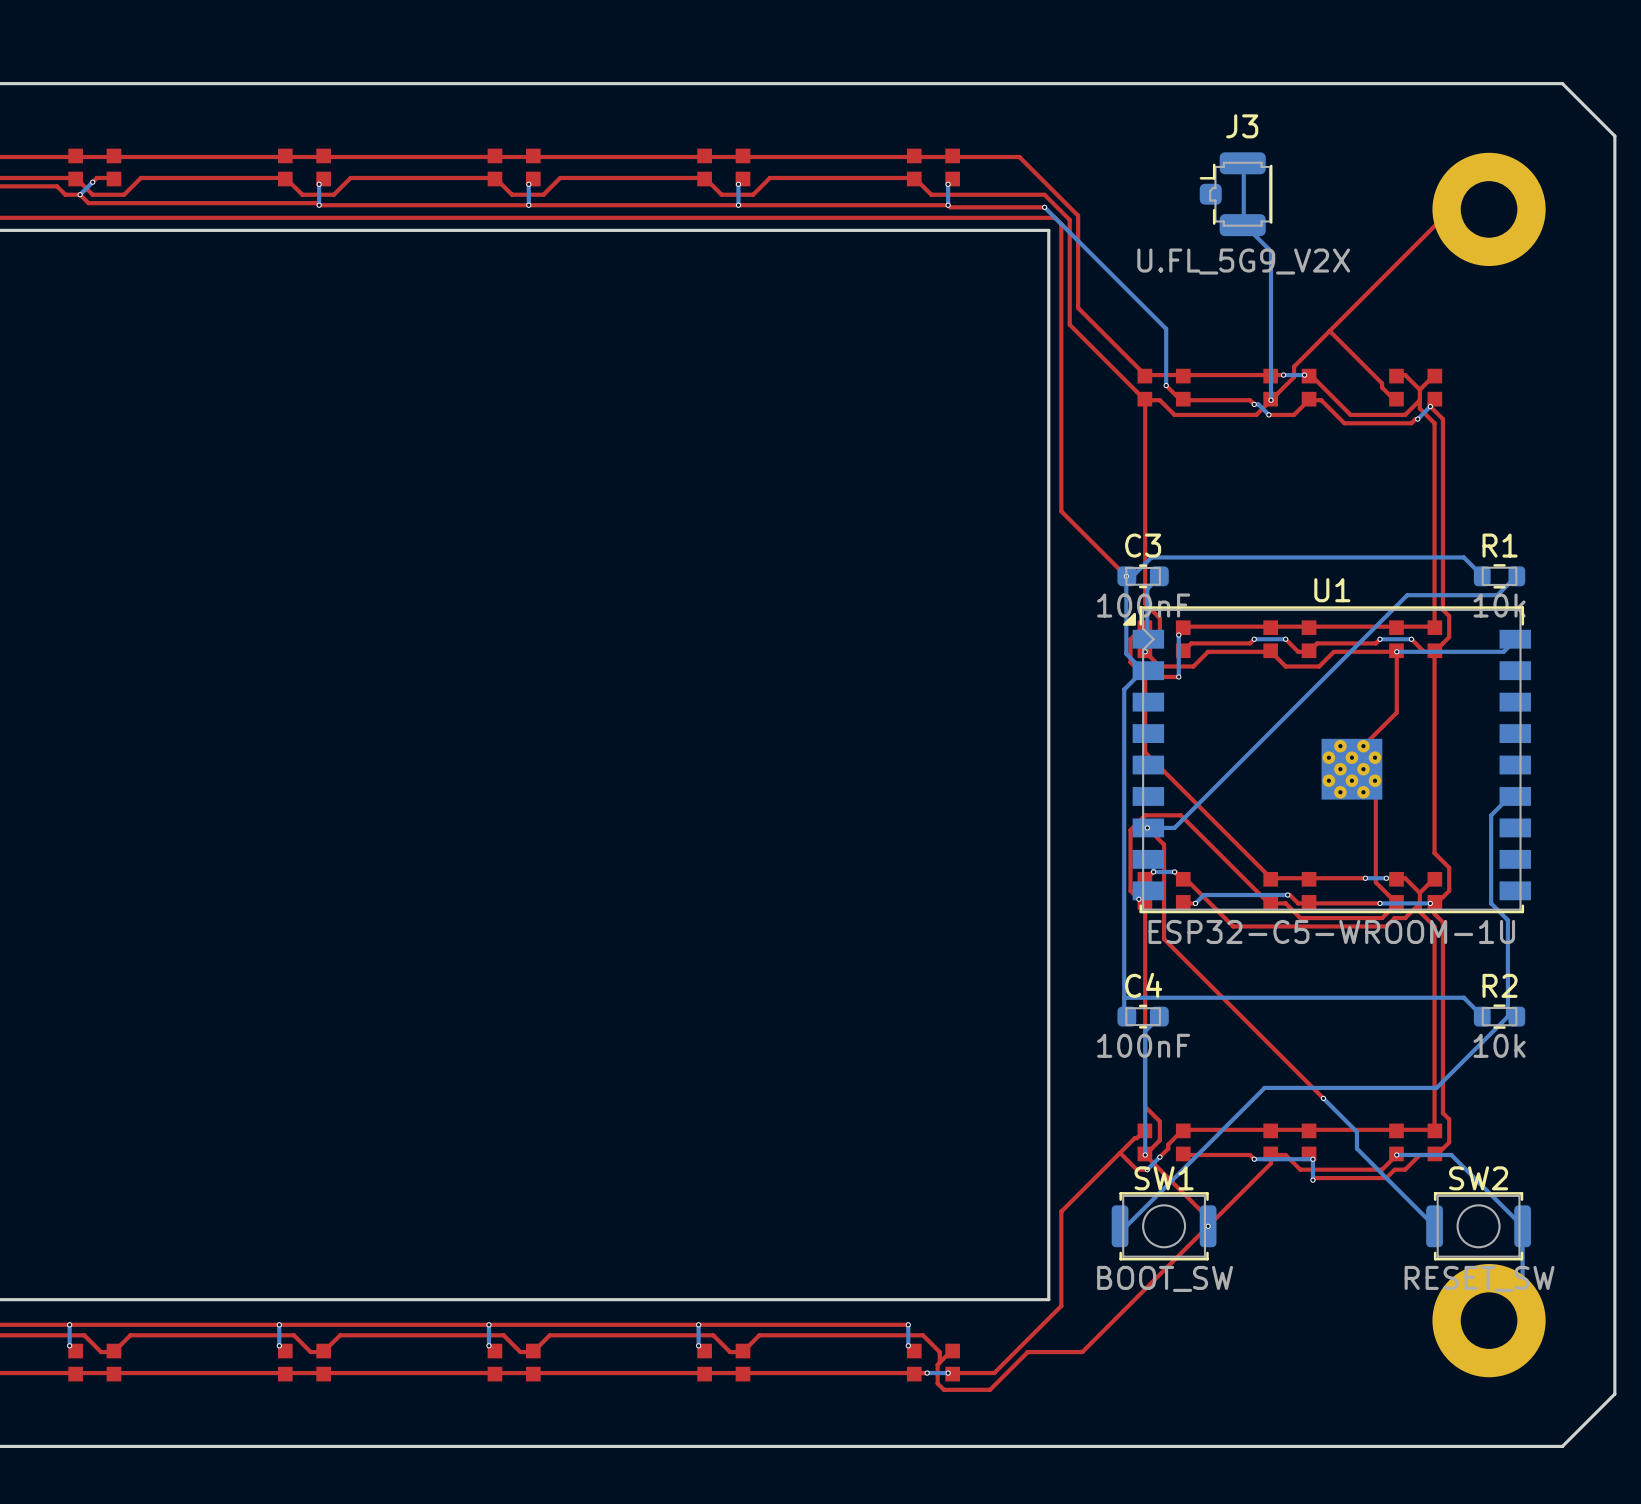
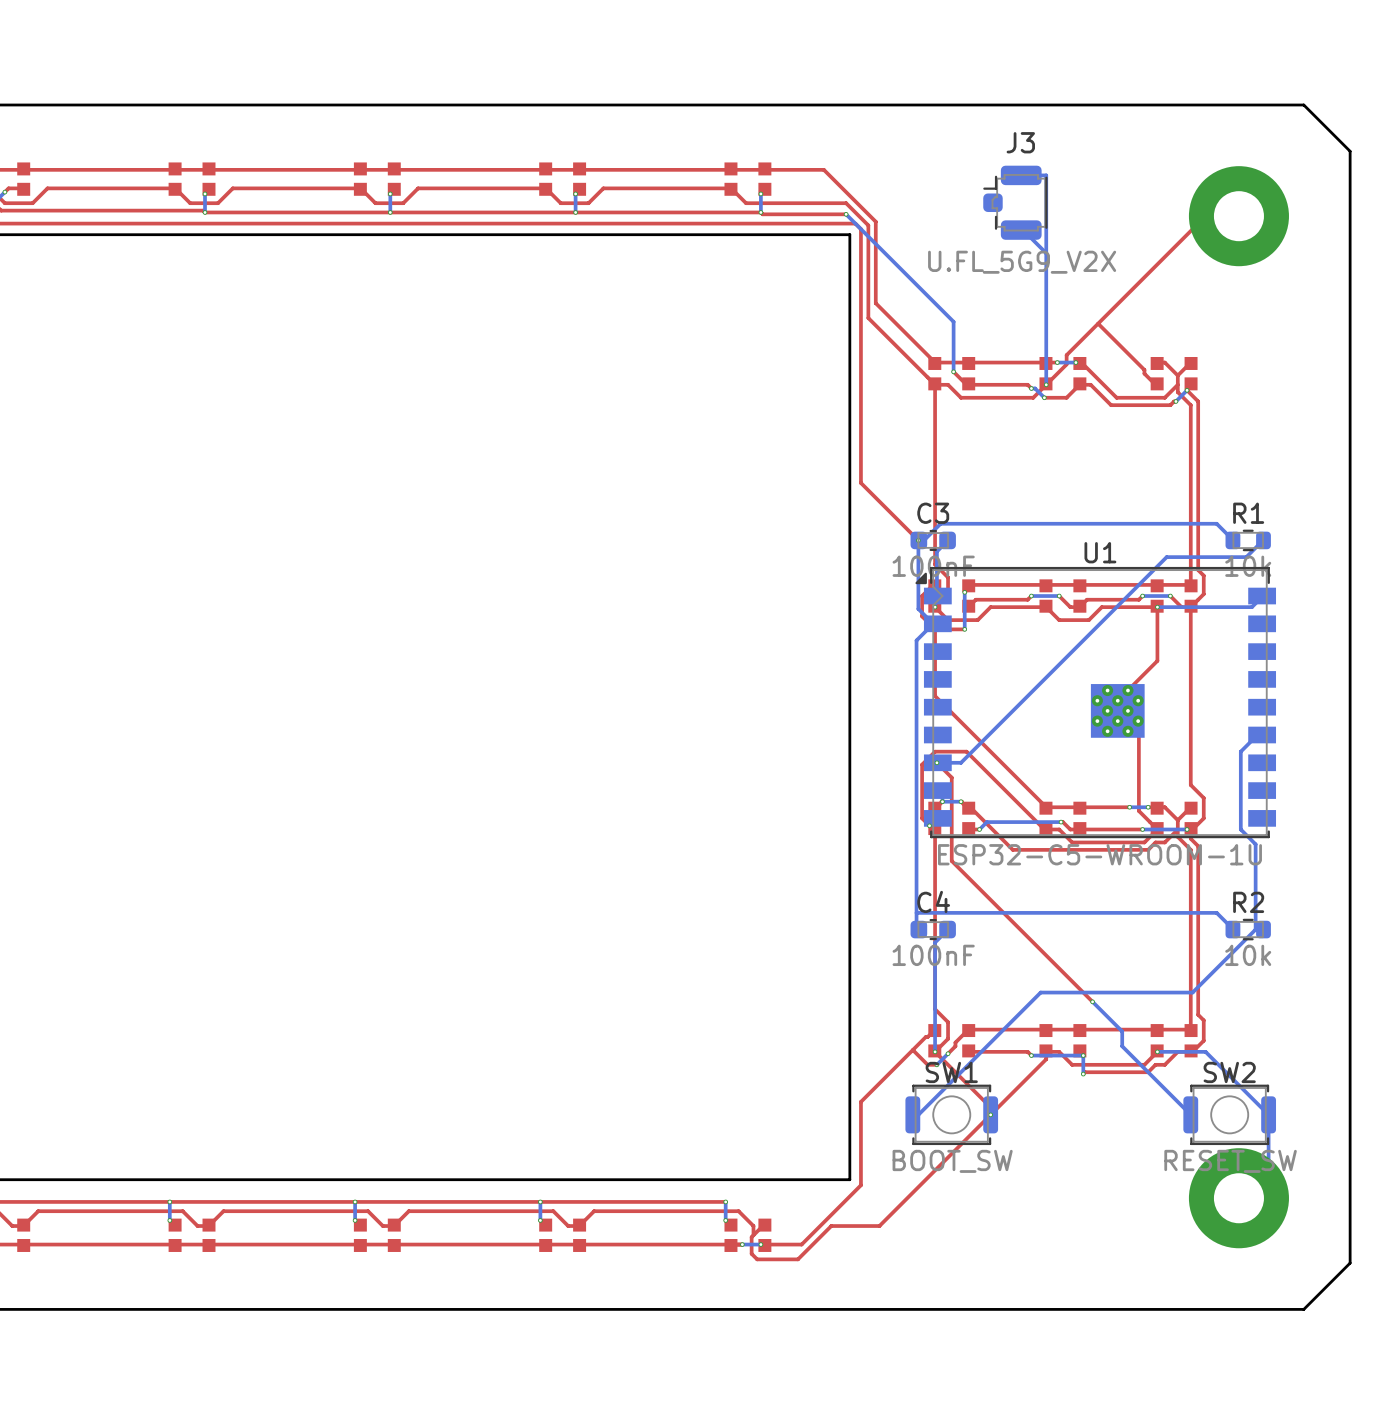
bottom track: (1243, 163) (1242, 225) -> (1022, 175) (1046, 175) (1046, 253)

